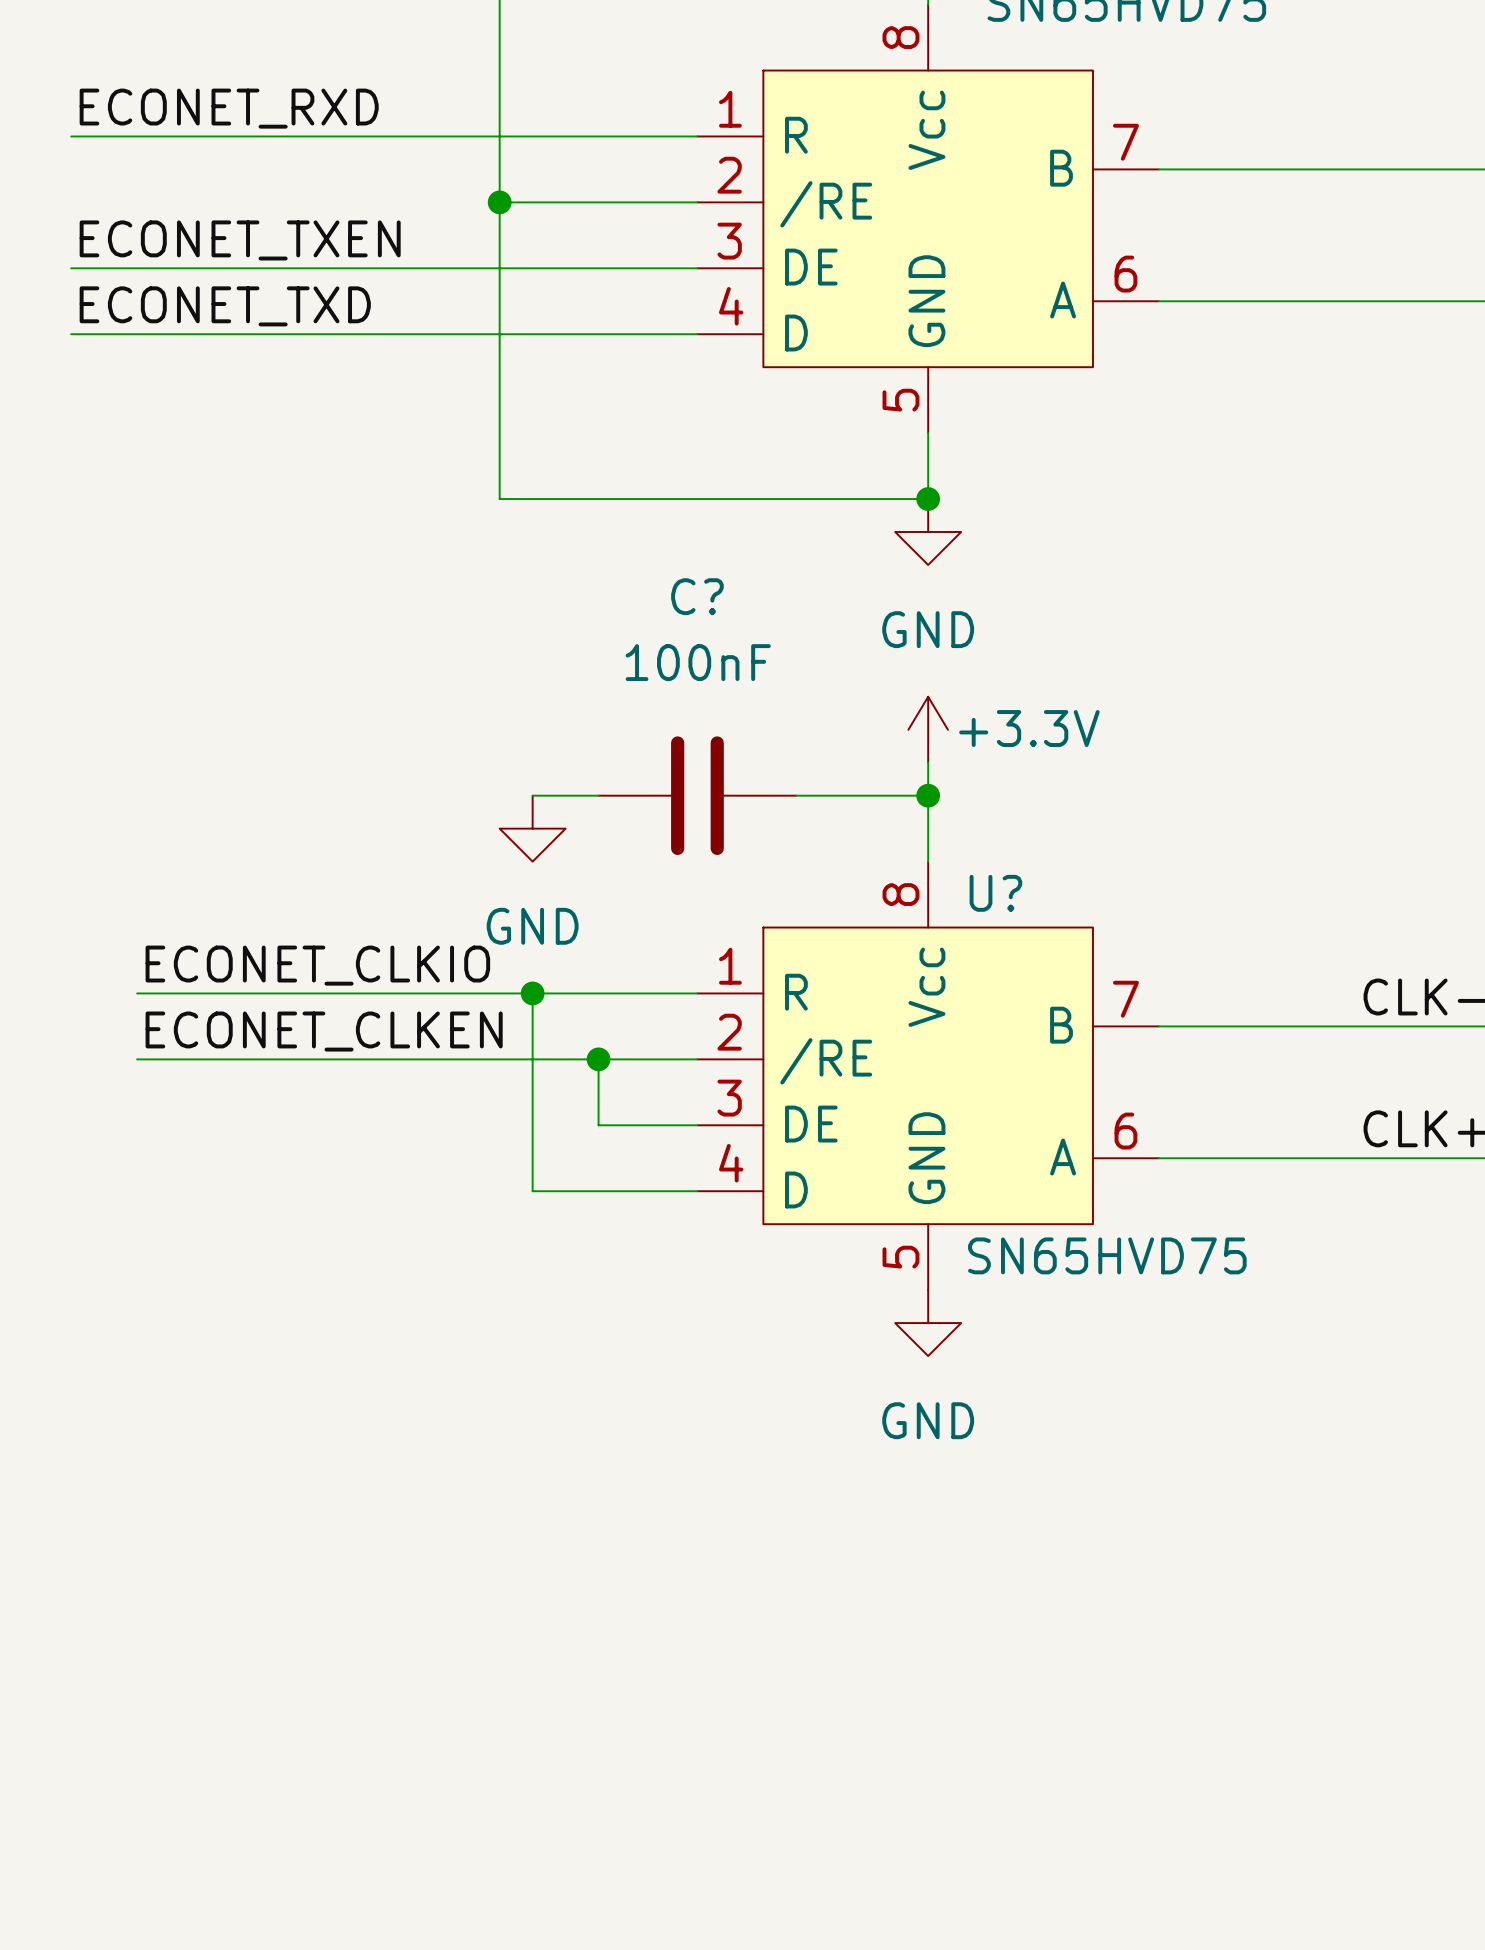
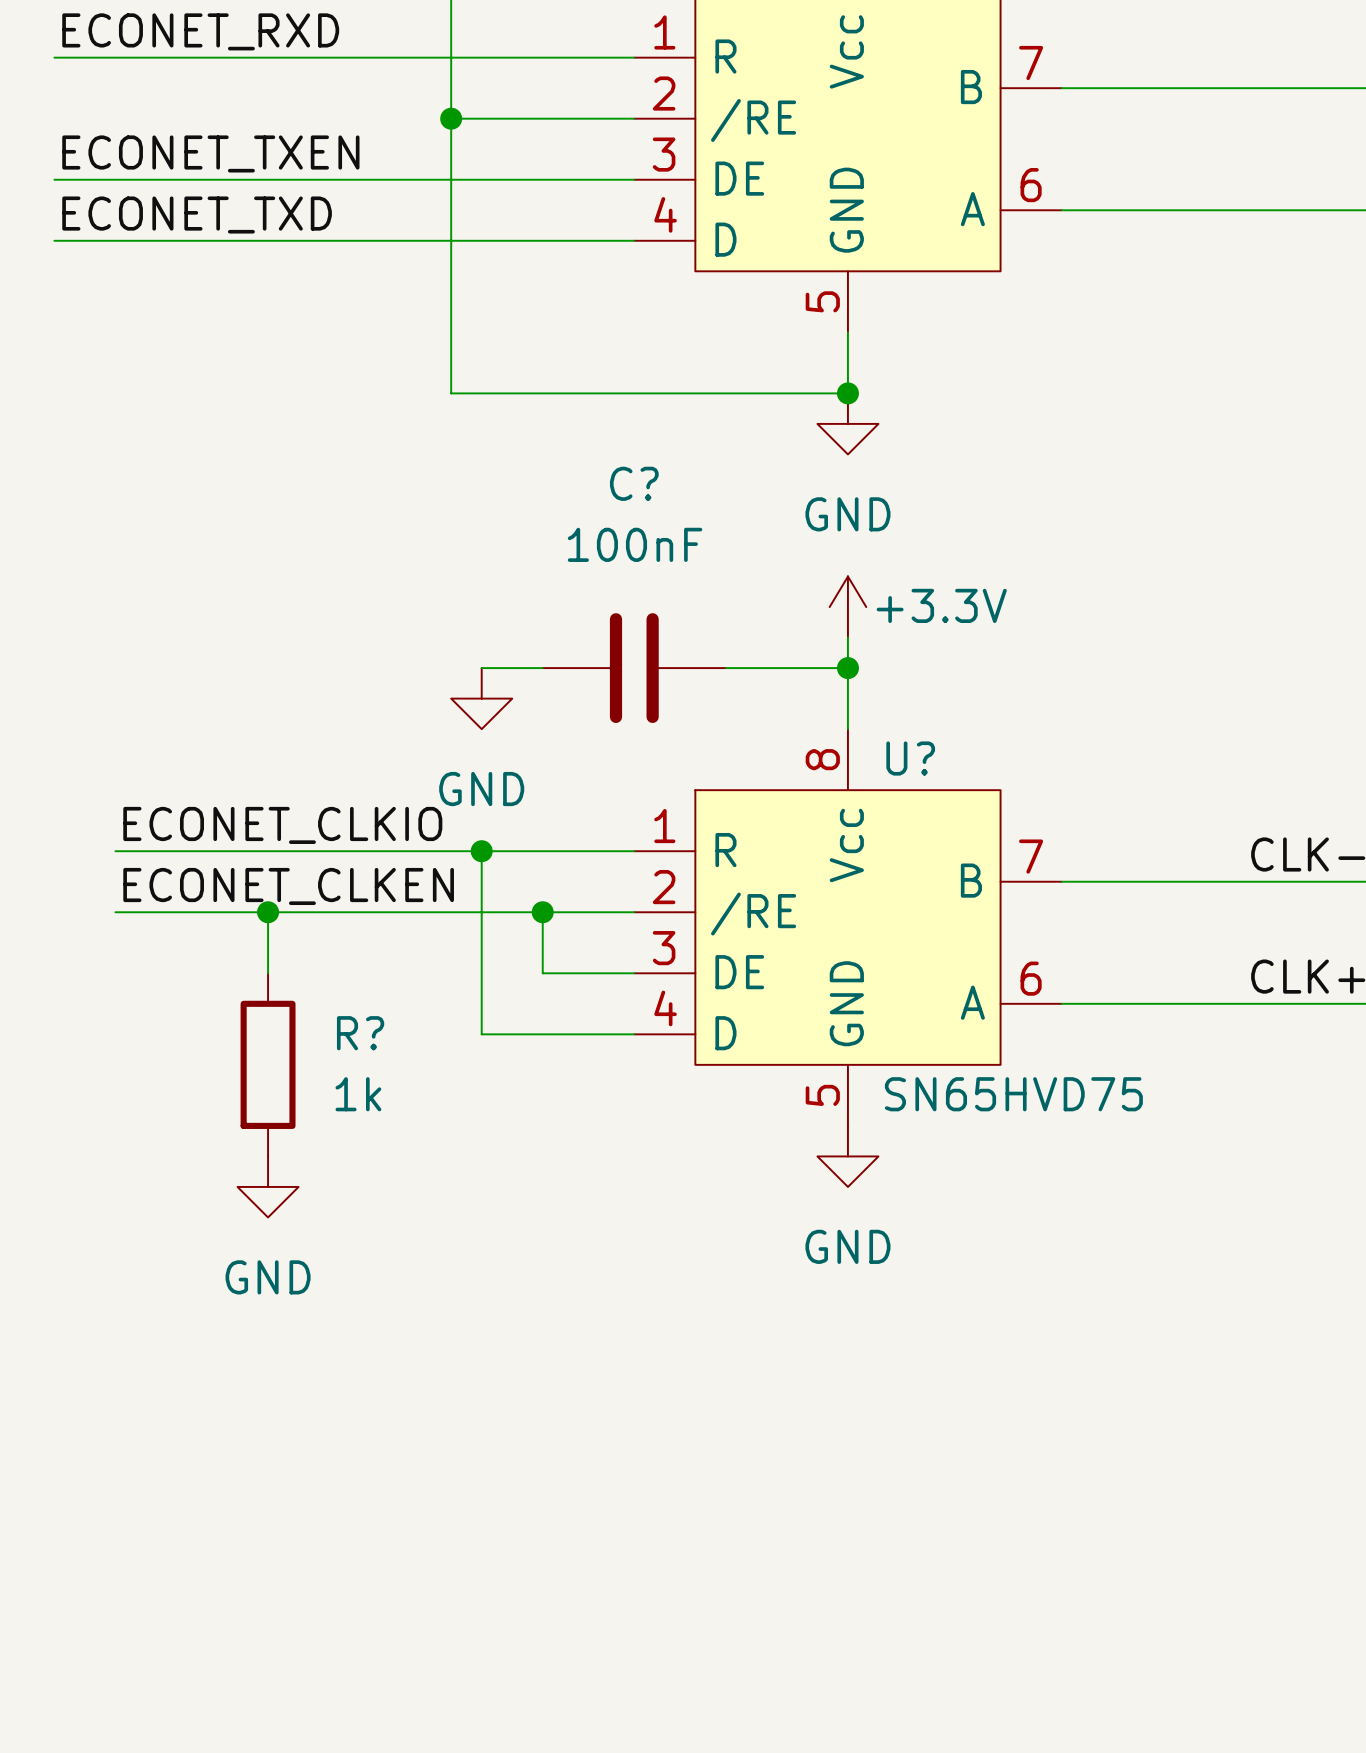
wire: none -> (268, 912) (268, 973)
junction: none -> (268, 912)
R?: none -> 1k (268, 1064)
power symbol: none -> GND (268, 1186)

